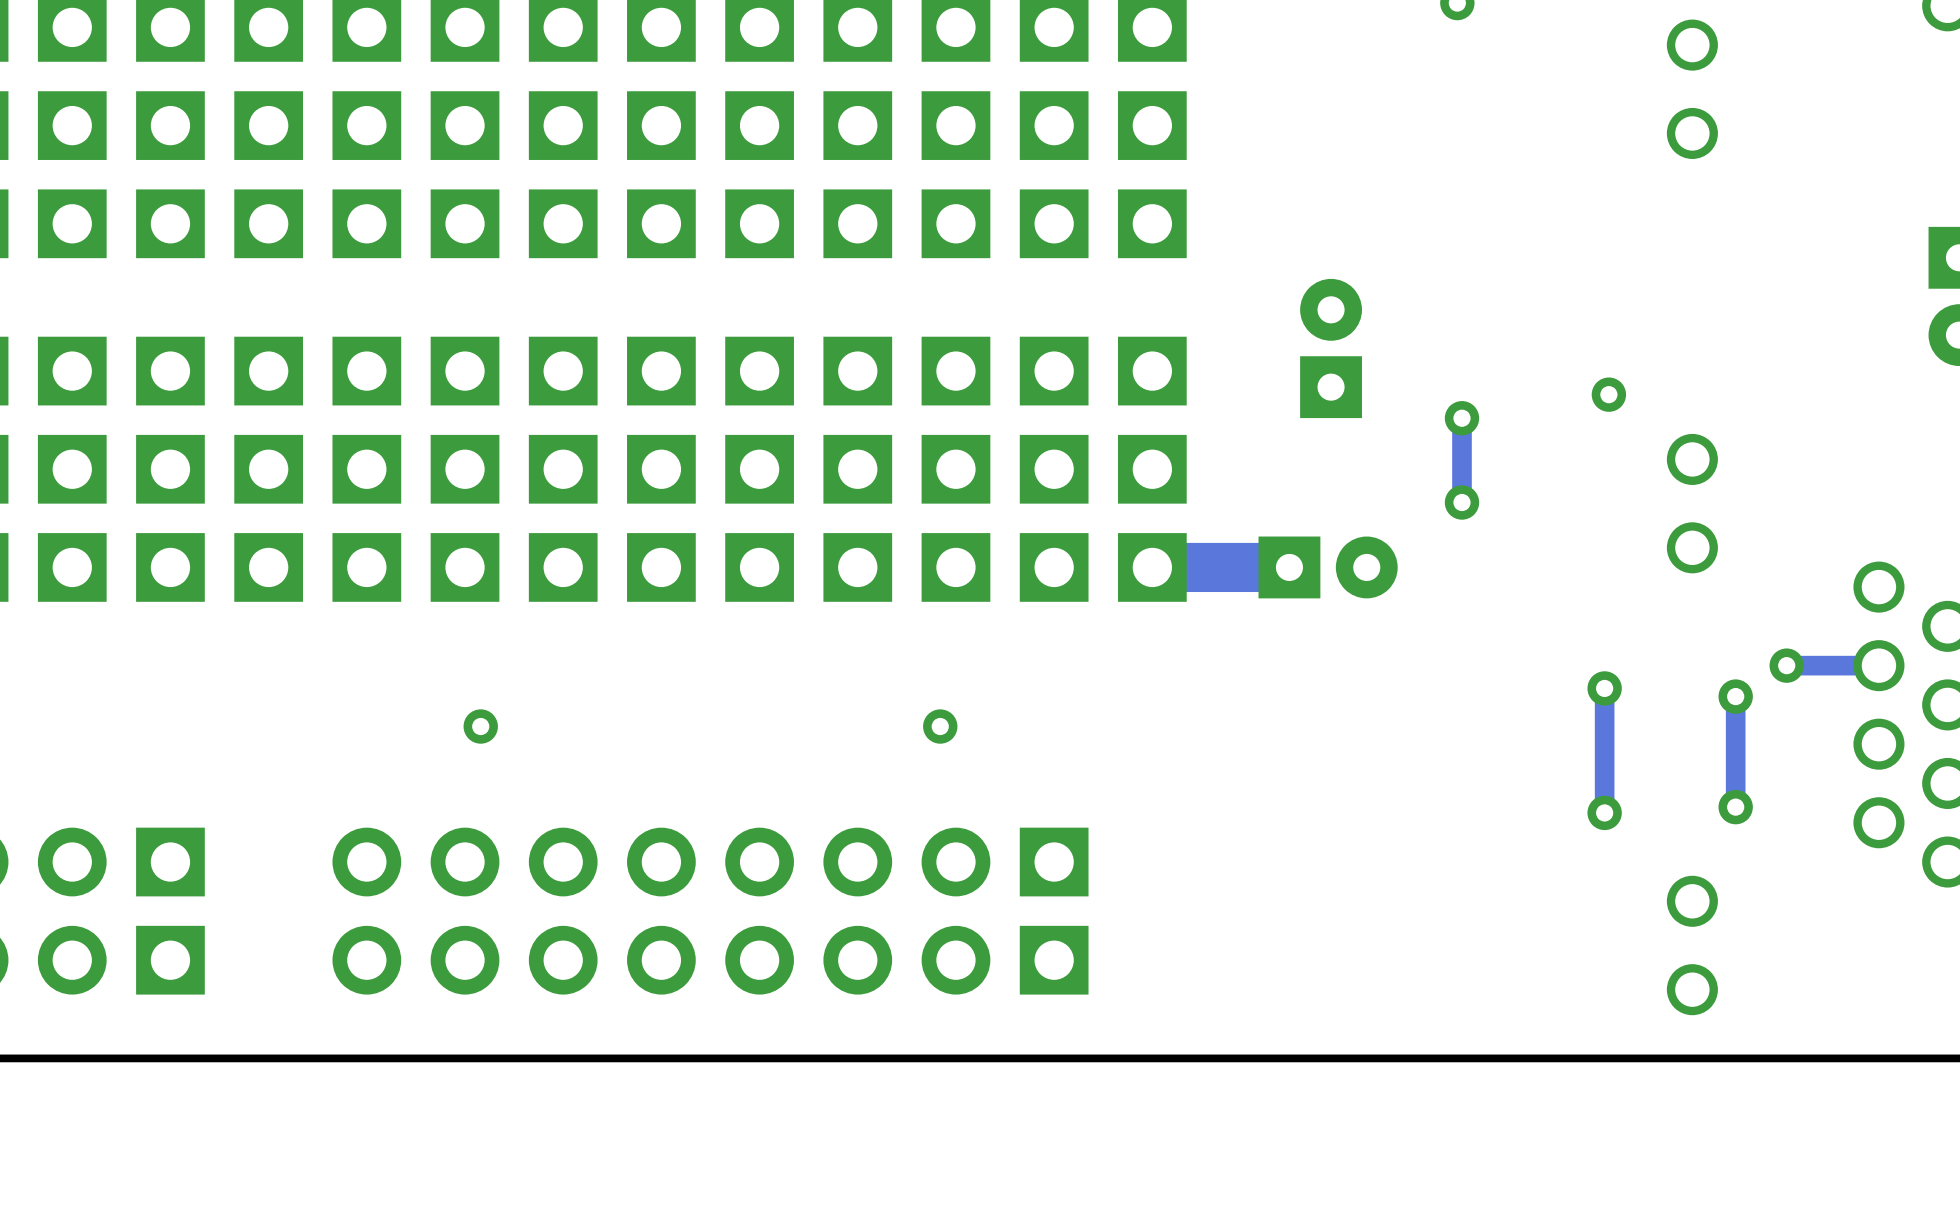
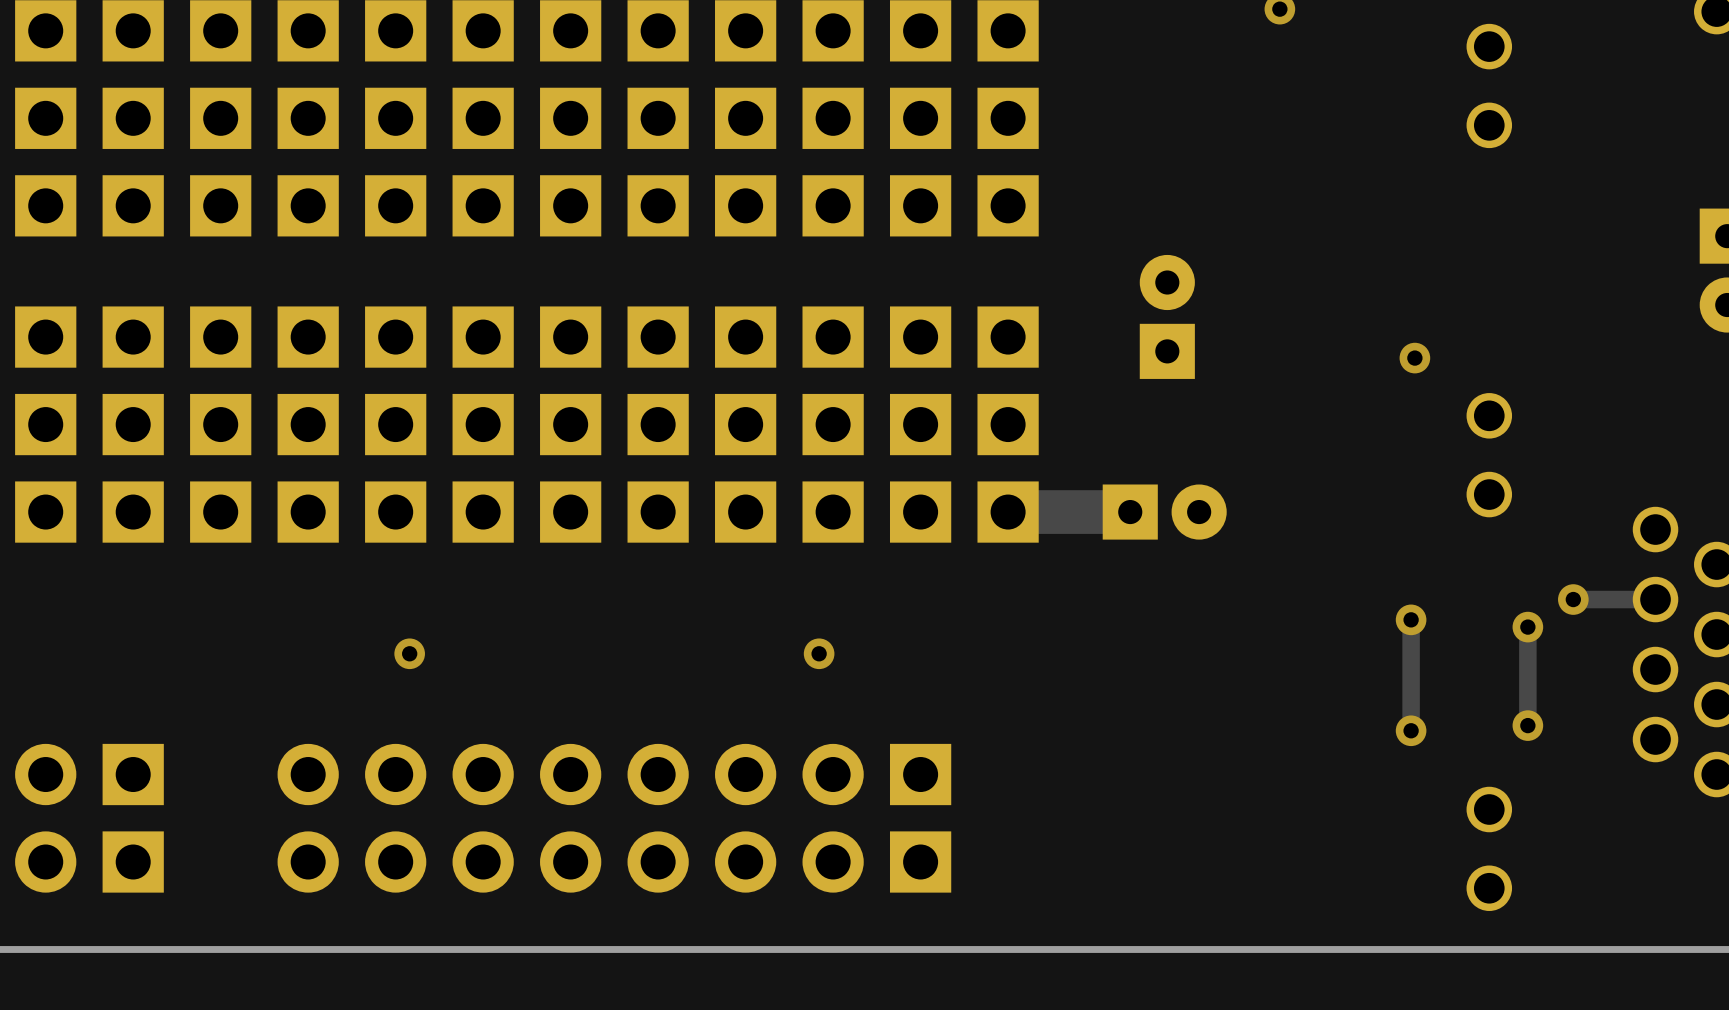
track: (1461, 418) (1461, 502) -> none
via: (1461, 418) -> none
via: (1461, 502) -> none

